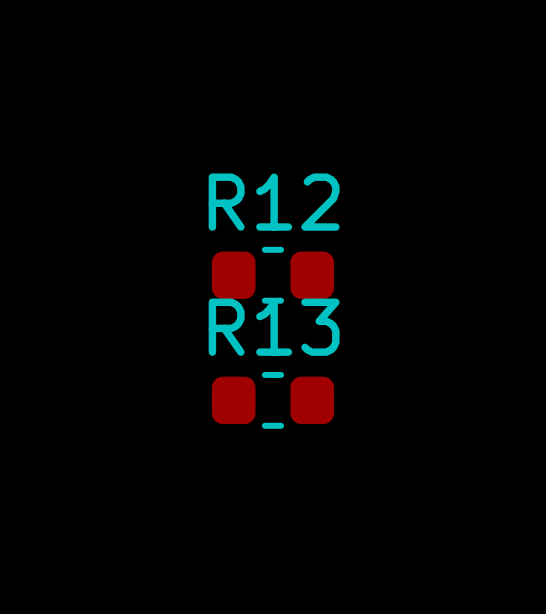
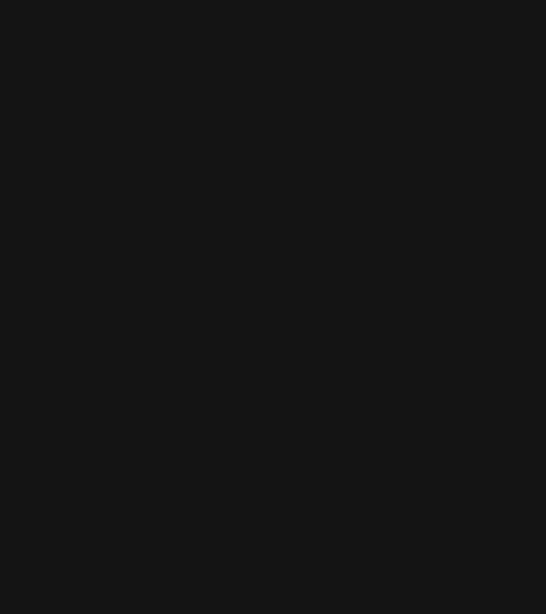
R12: (272, 275) -> none
R13: (272, 400) -> none

